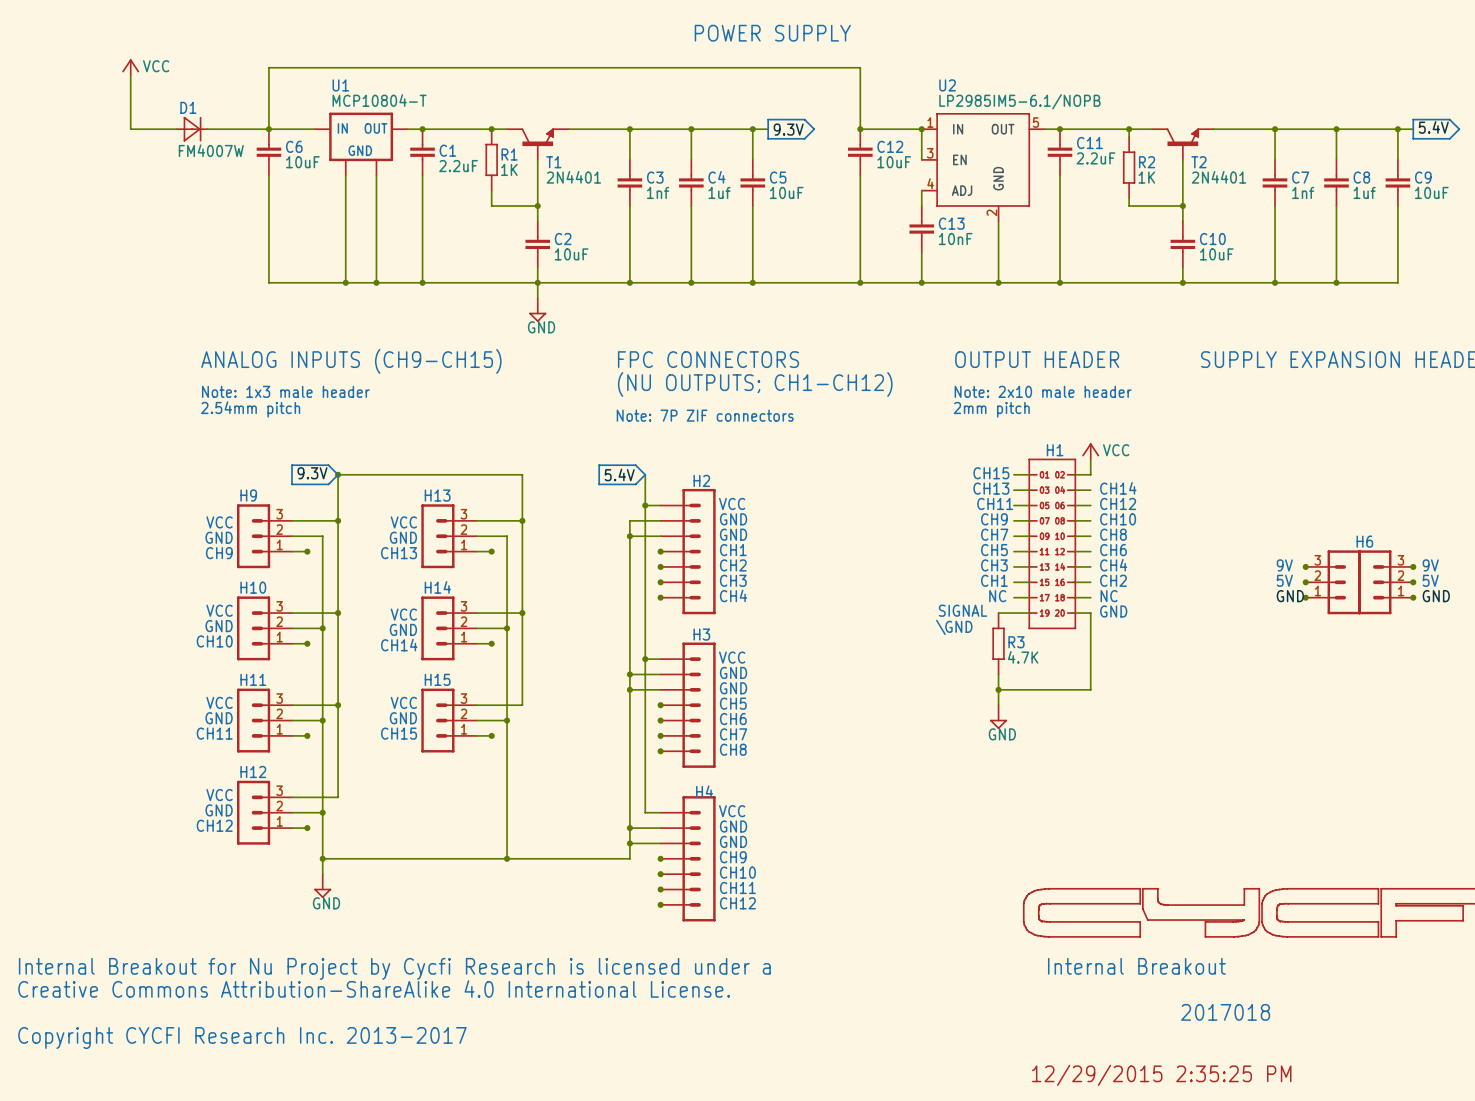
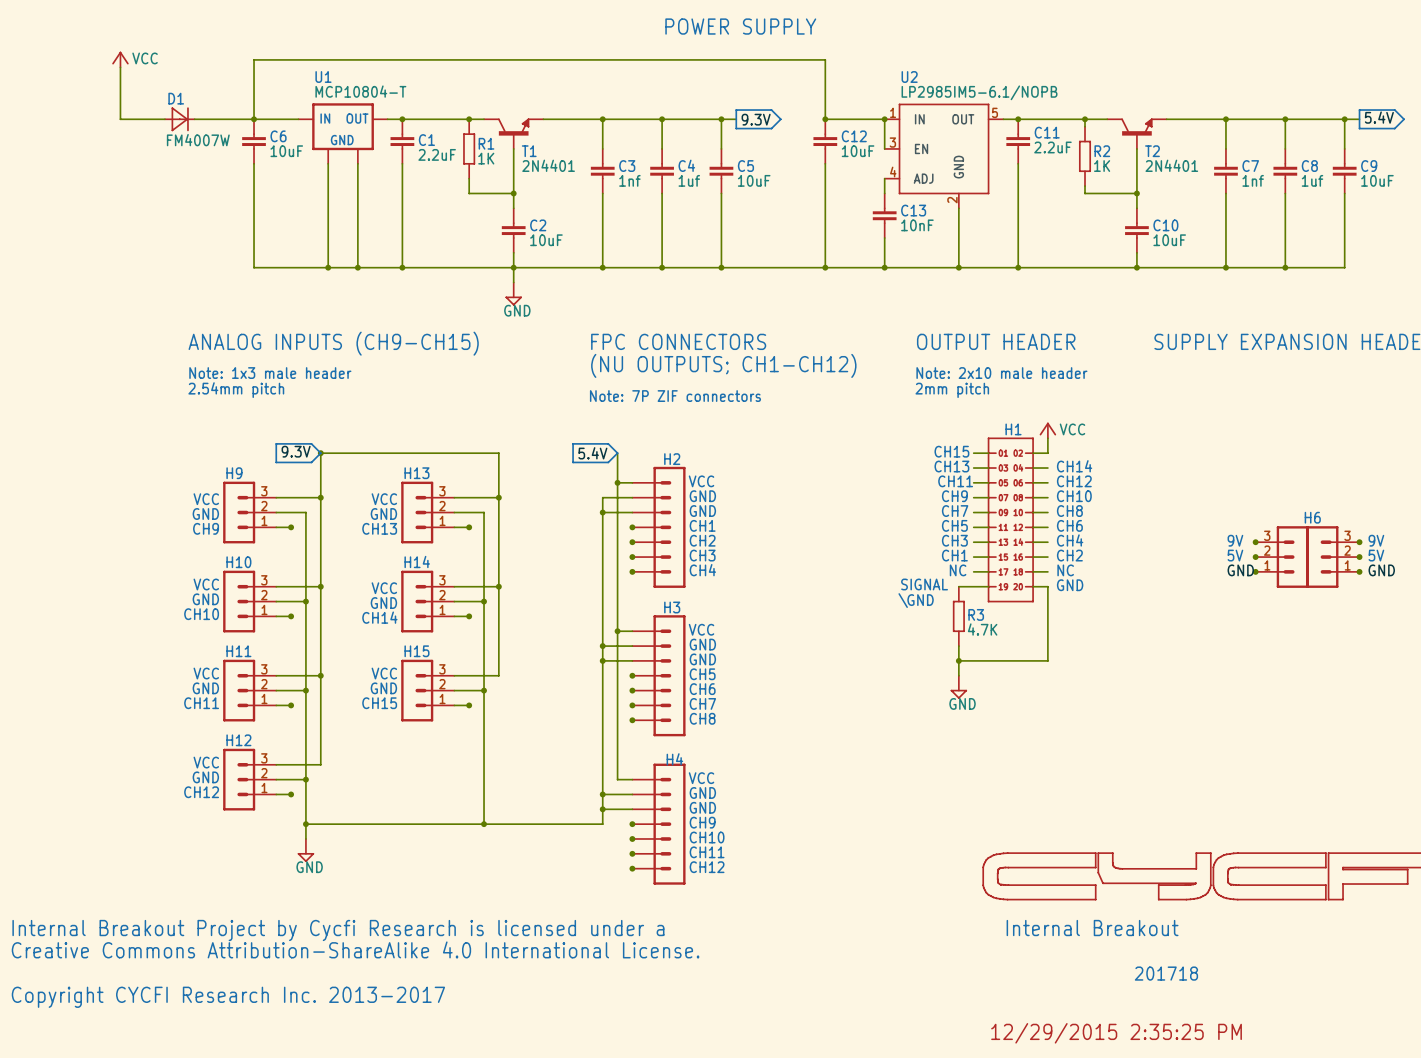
text: Internal Breakout for Nu Project by Cycfi Research is licensed under a (394, 968) -> Internal Breakout Project by Cycfi Research is licensed under a (338, 930)
text: 2017018 (1225, 1012) -> 201718 (1166, 973)

